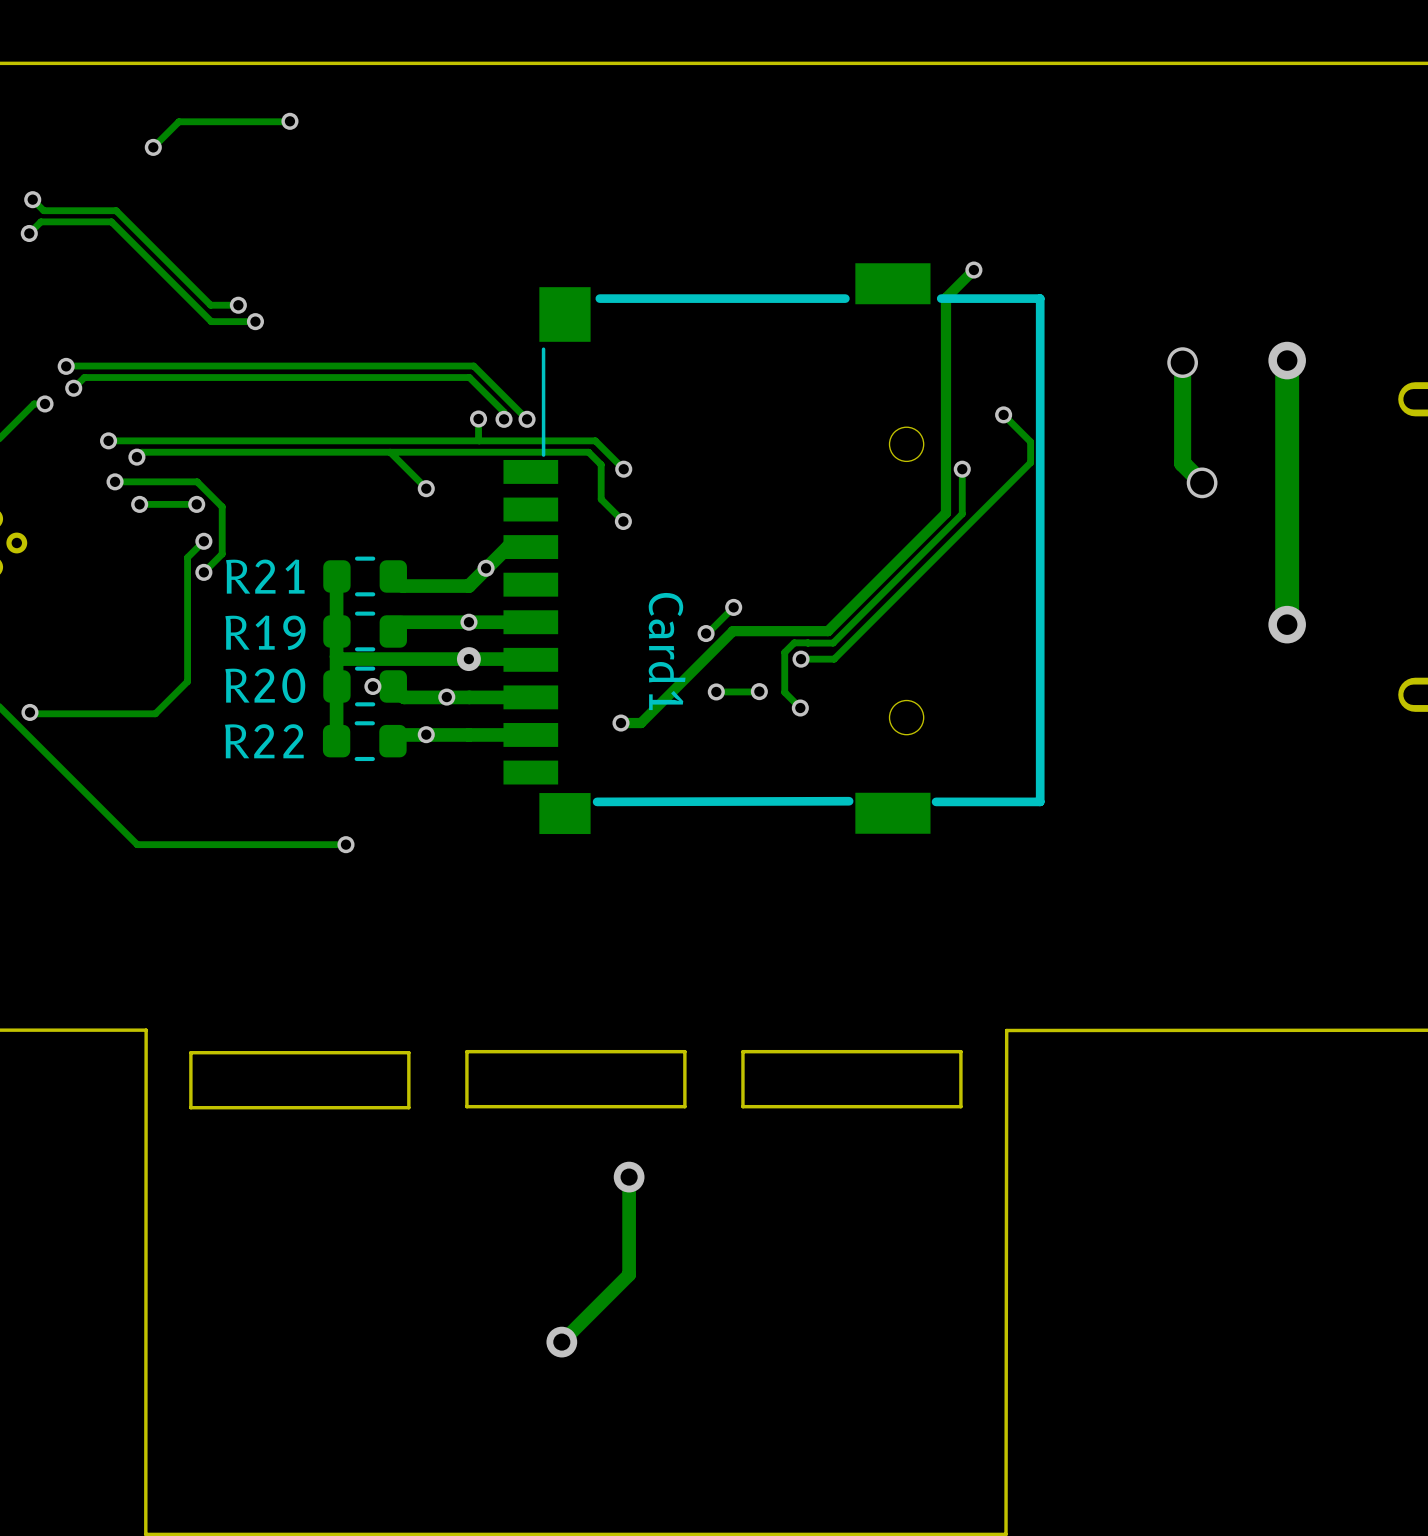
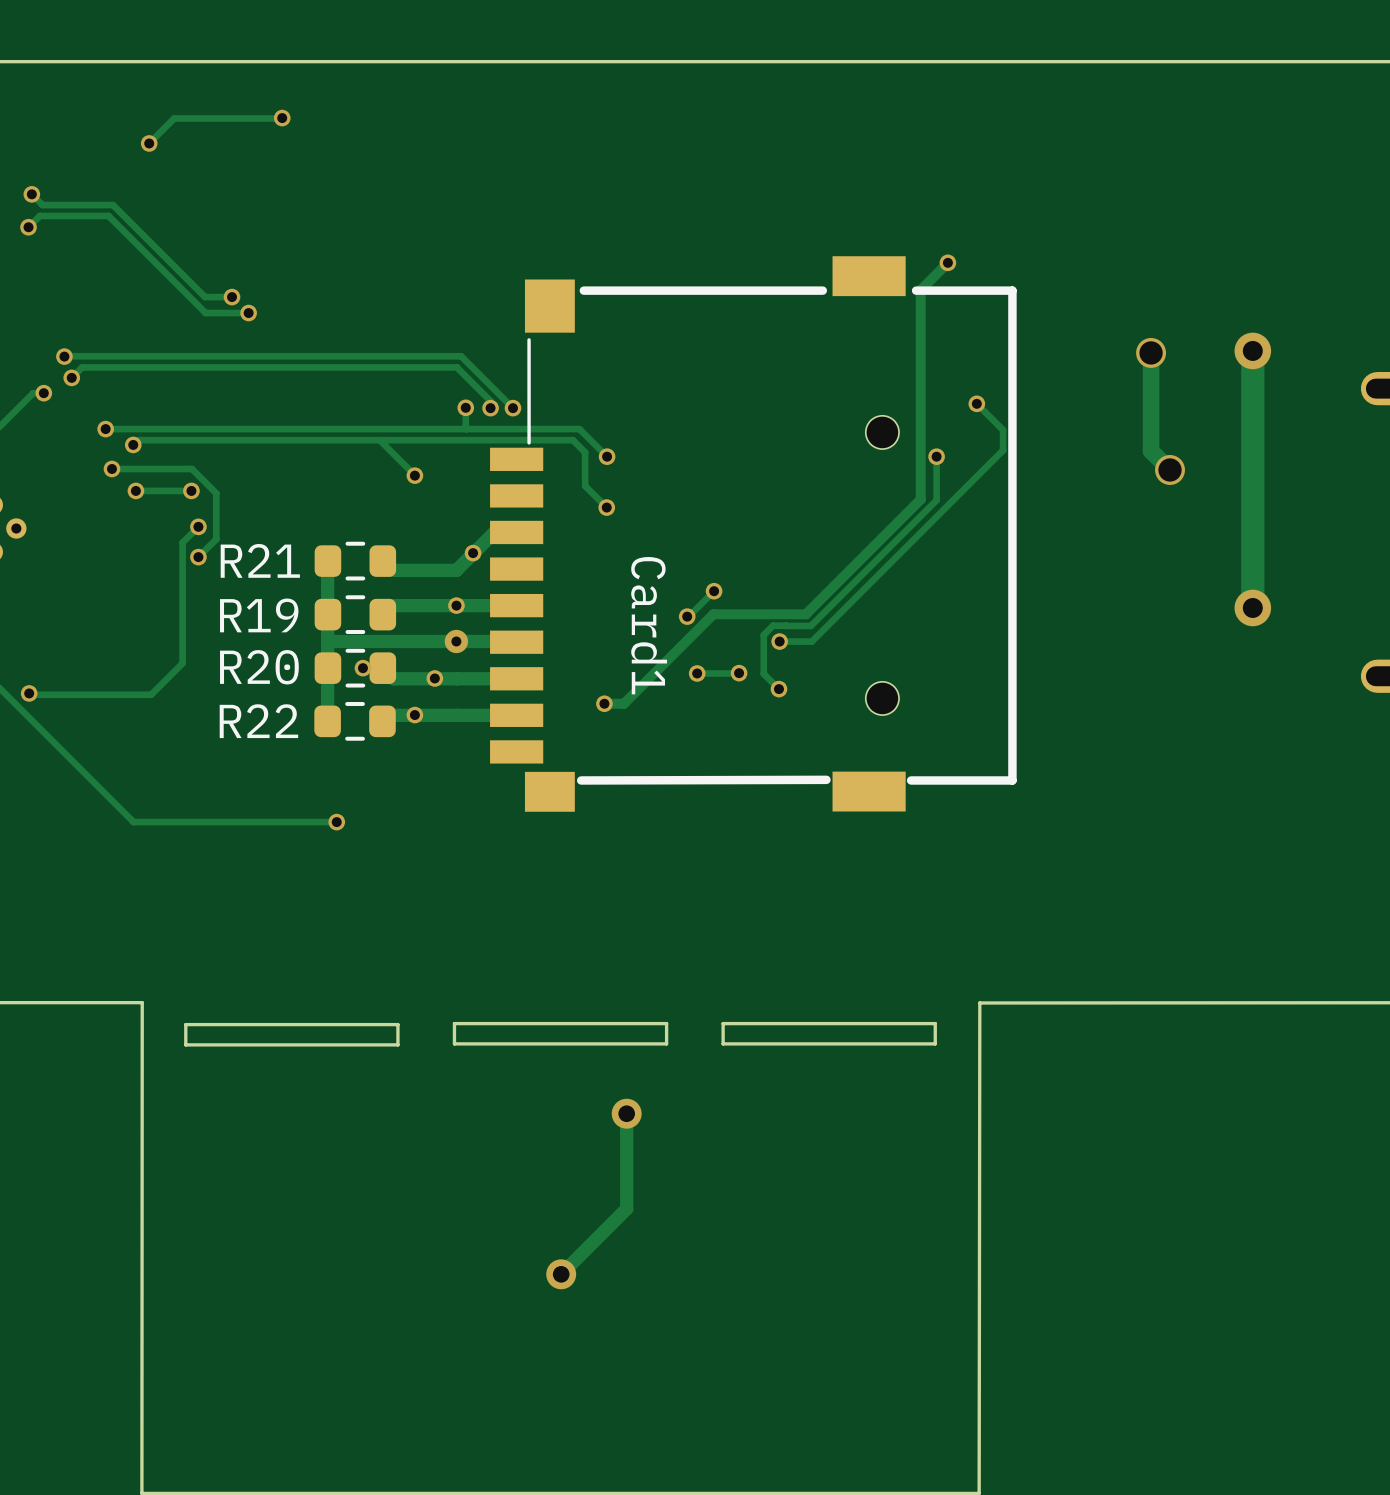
board edge: (684, 1072) (684, 1106) (466, 1106) (466, 1072) -> (666, 1043) (454, 1043)
board edge: (960, 1072) (960, 1106) (742, 1106) (742, 1072) -> (935, 1043) (723, 1043)
board edge: (408, 1073) (408, 1107) (190, 1107) (190, 1073) -> (397, 1044) (185, 1044)
track: (629, 1177) (629, 1274) (561, 1342) -> (626, 1113) (626, 1208) (561, 1274)
via position: (629, 1177) -> (626, 1113)
via position: (561, 1342) -> (561, 1274)

